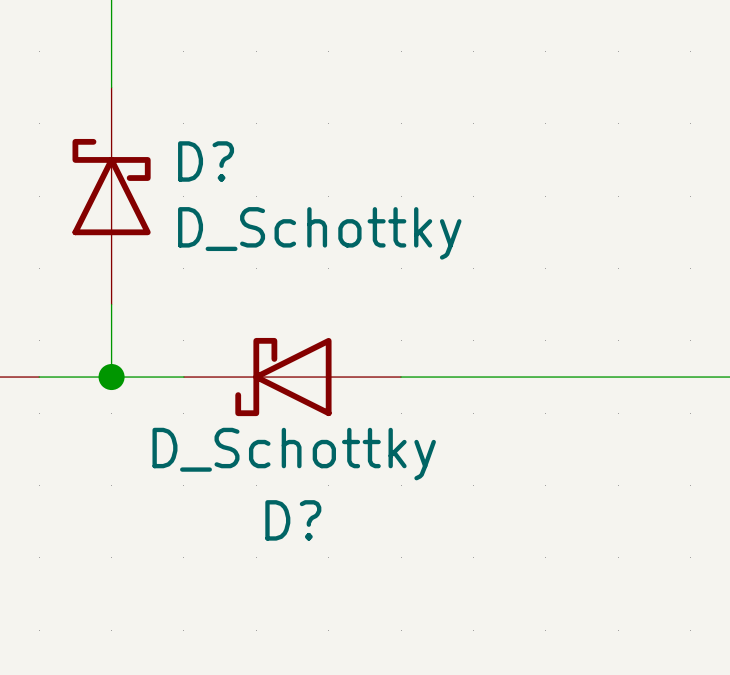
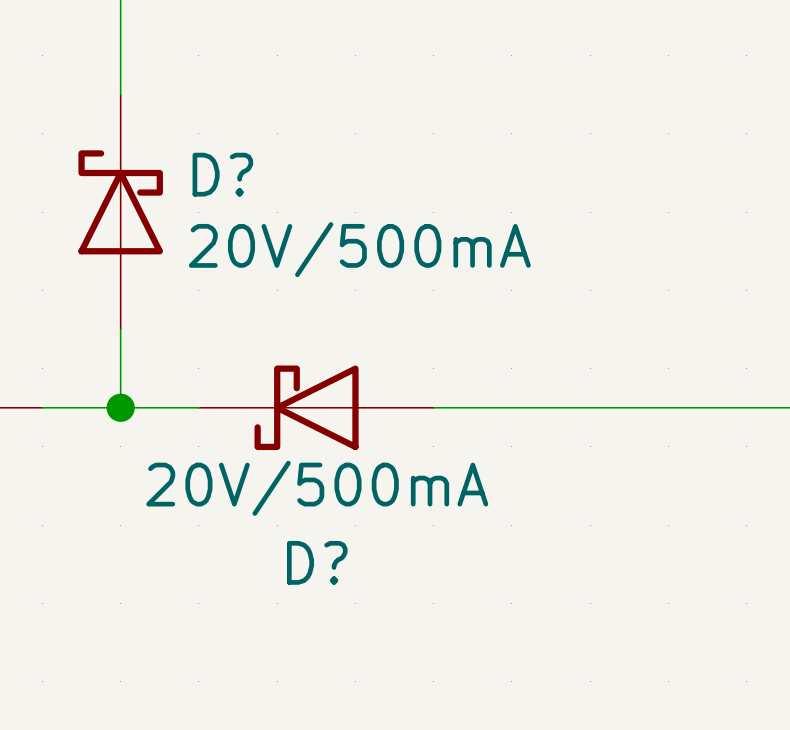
D? value: D_Schottky (319, 233) -> 20V/500mA (359, 249)
D? value: D_Schottky (294, 454) -> 20V/500mA (317, 488)

